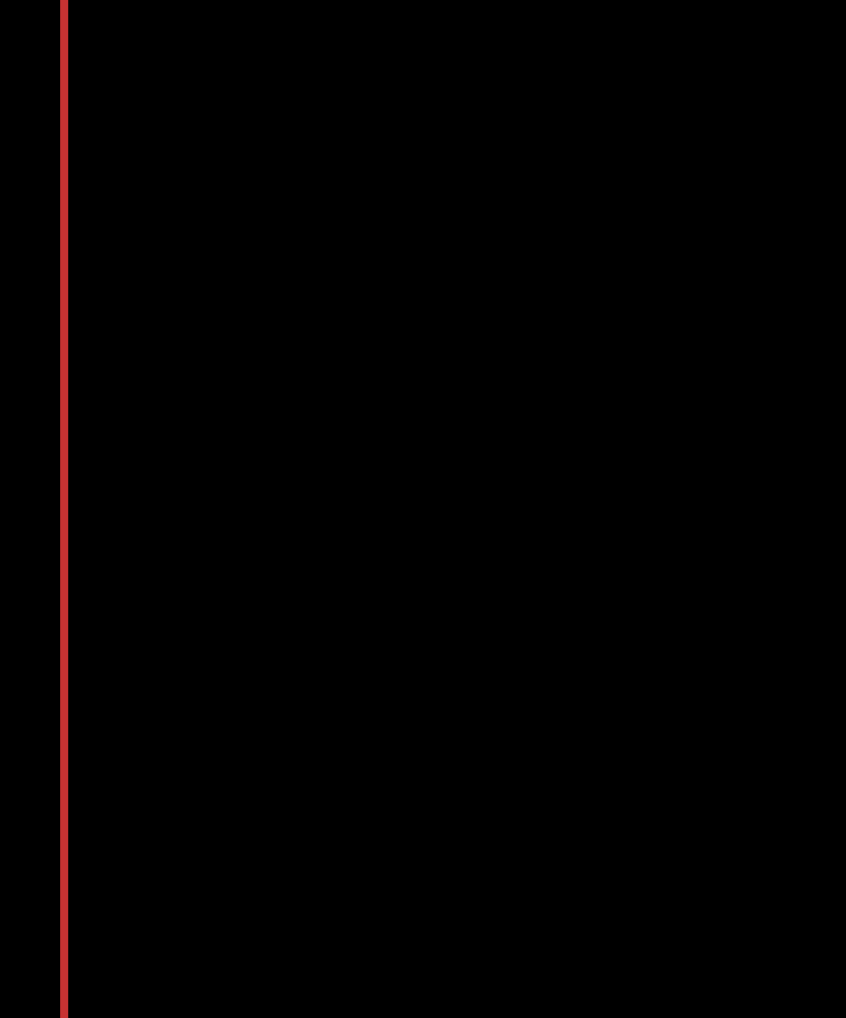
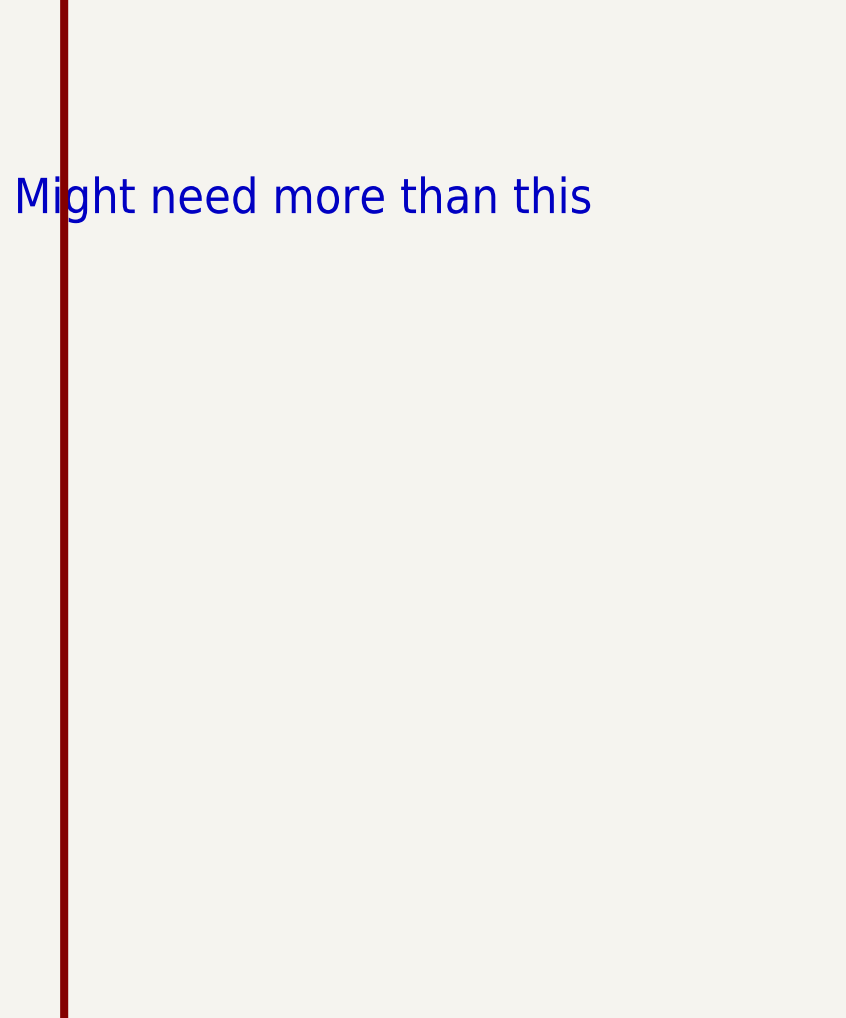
text: none -> Might need more than this (304, 199)

